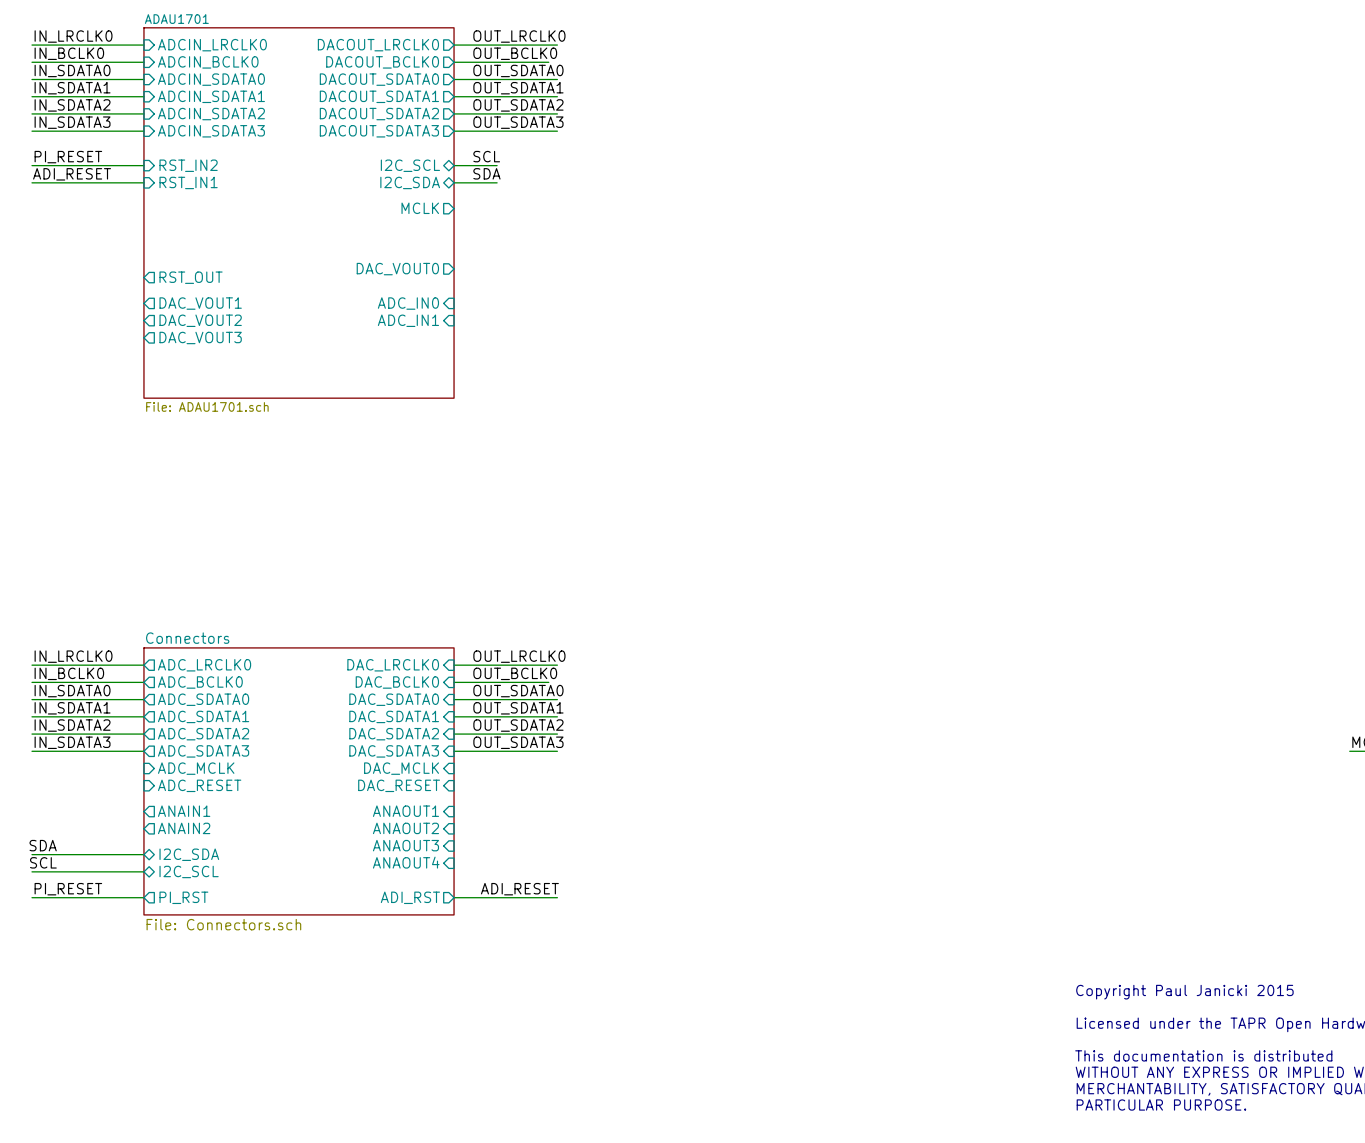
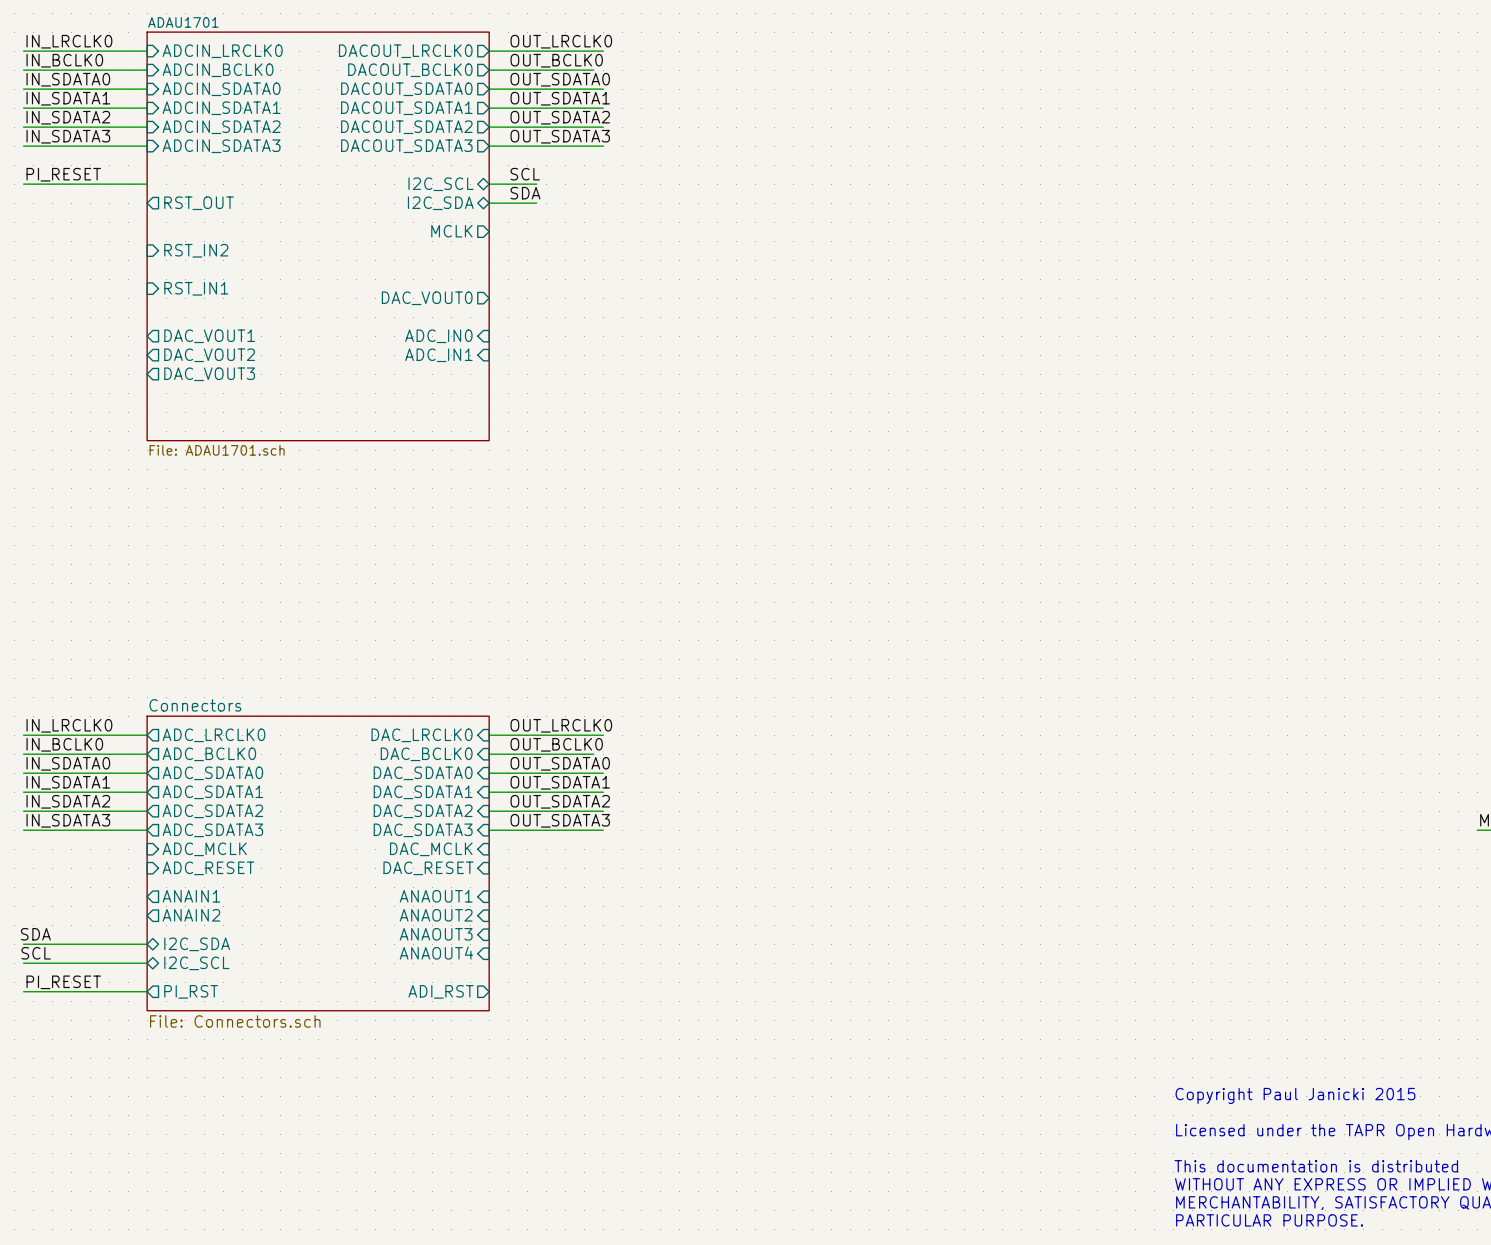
sheet pin position: RST_IN2 (188, 165) -> RST_IN2 (196, 250)
label: ADI_RESET (72, 174) -> none
wire: (32, 182) (143, 182) -> none
sheet pin shape: input (188, 182) -> output (199, 203)
sheet pin: RST_IN1 (188, 182) -> RST_OUT (199, 203)
sheet pin: none -> RST_IN1 (196, 288)
sheet pin: RST_OUT (191, 277) -> none
label: ADI_RESET (519, 889) -> none
wire: (454, 897) (557, 897) -> none

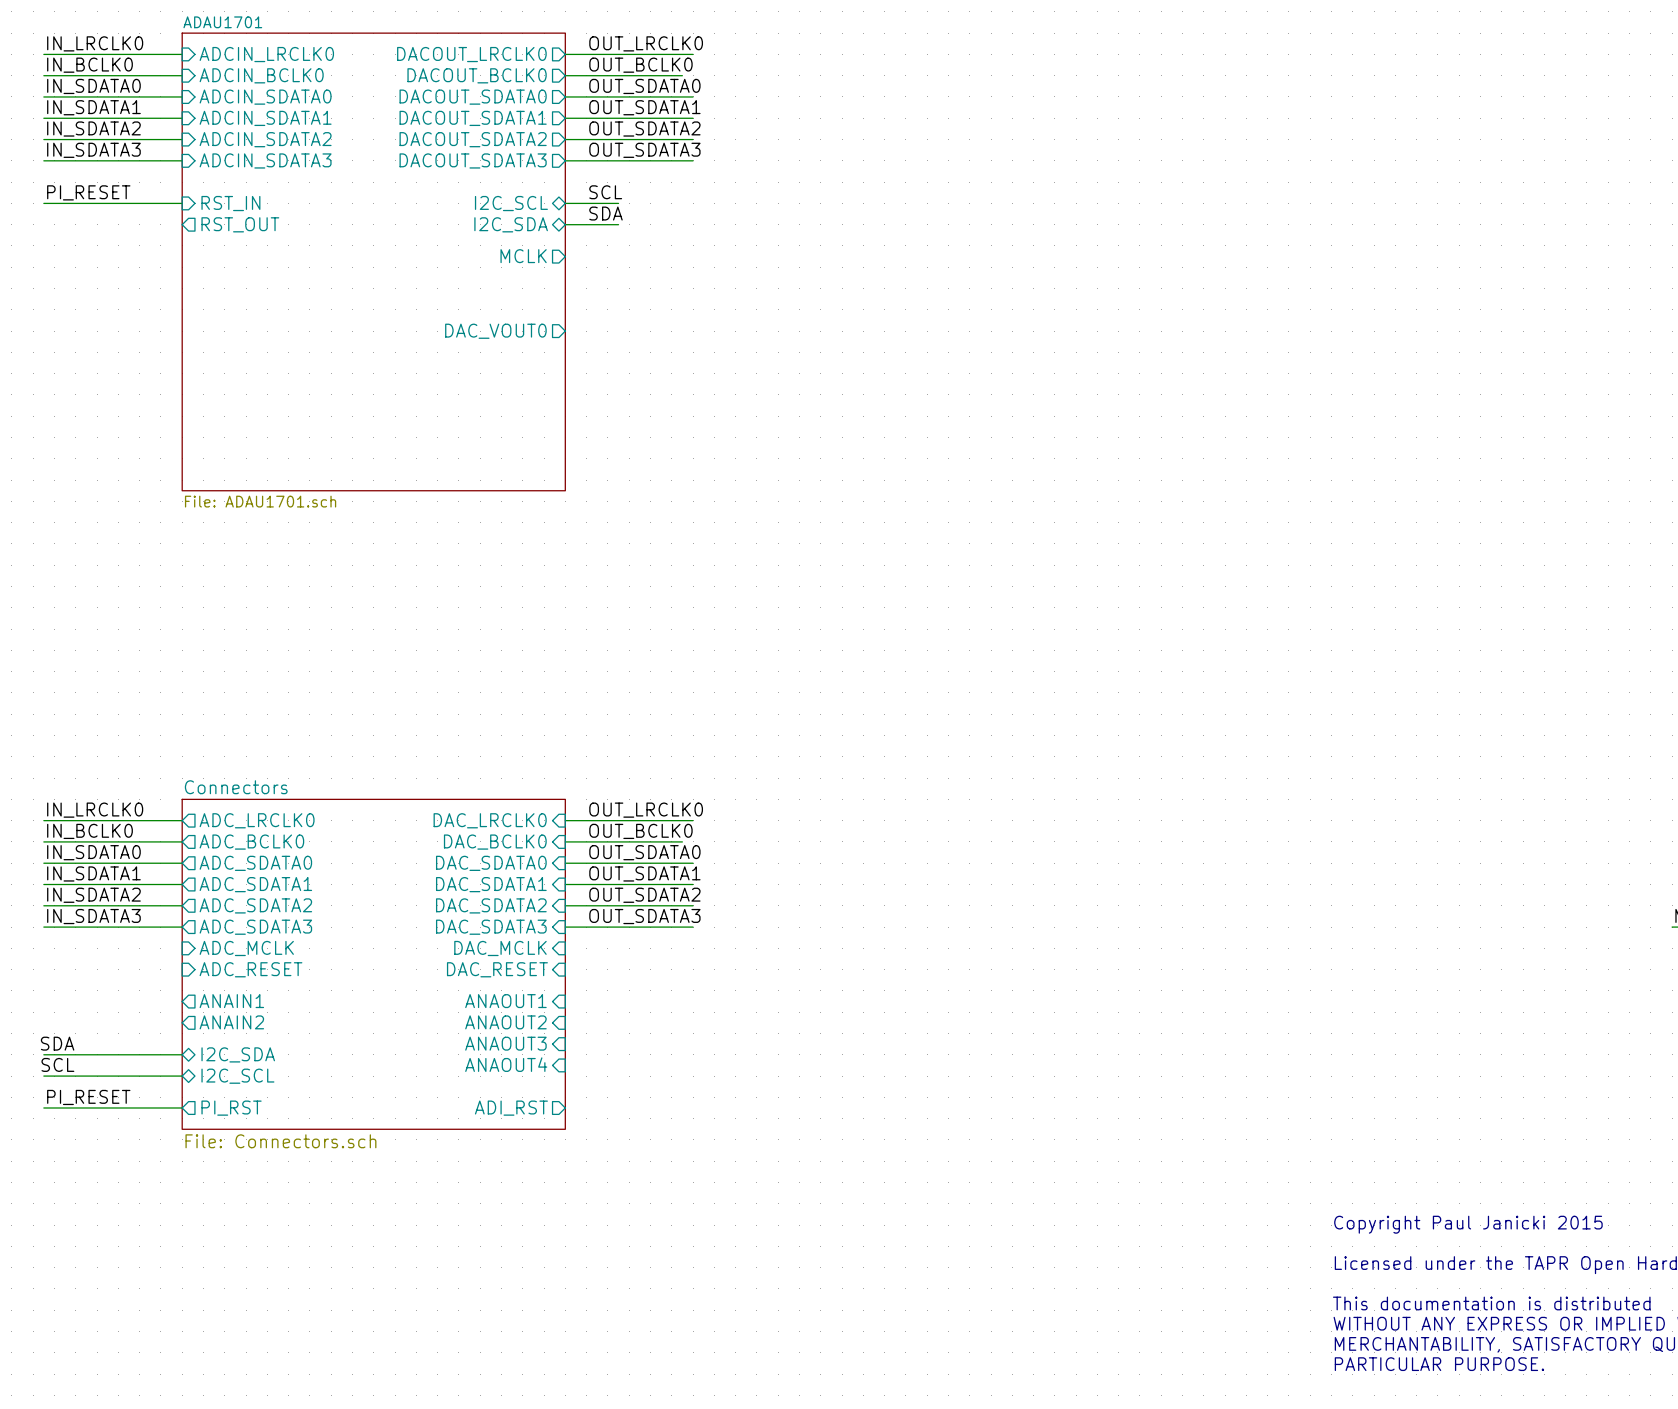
sheet pin: none -> RST_IN (230, 203)
sheet pin: RST_IN2 (196, 250) -> none
sheet pin: RST_IN1 (196, 288) -> none
sheet pin: DAC_VOUT1 (209, 336) -> none
sheet pin: ADC_IN0 (438, 336) -> none
sheet pin: DAC_VOUT2 (209, 355) -> none
sheet pin: ADC_IN1 (438, 355) -> none
sheet pin: DAC_VOUT3 (209, 374) -> none

